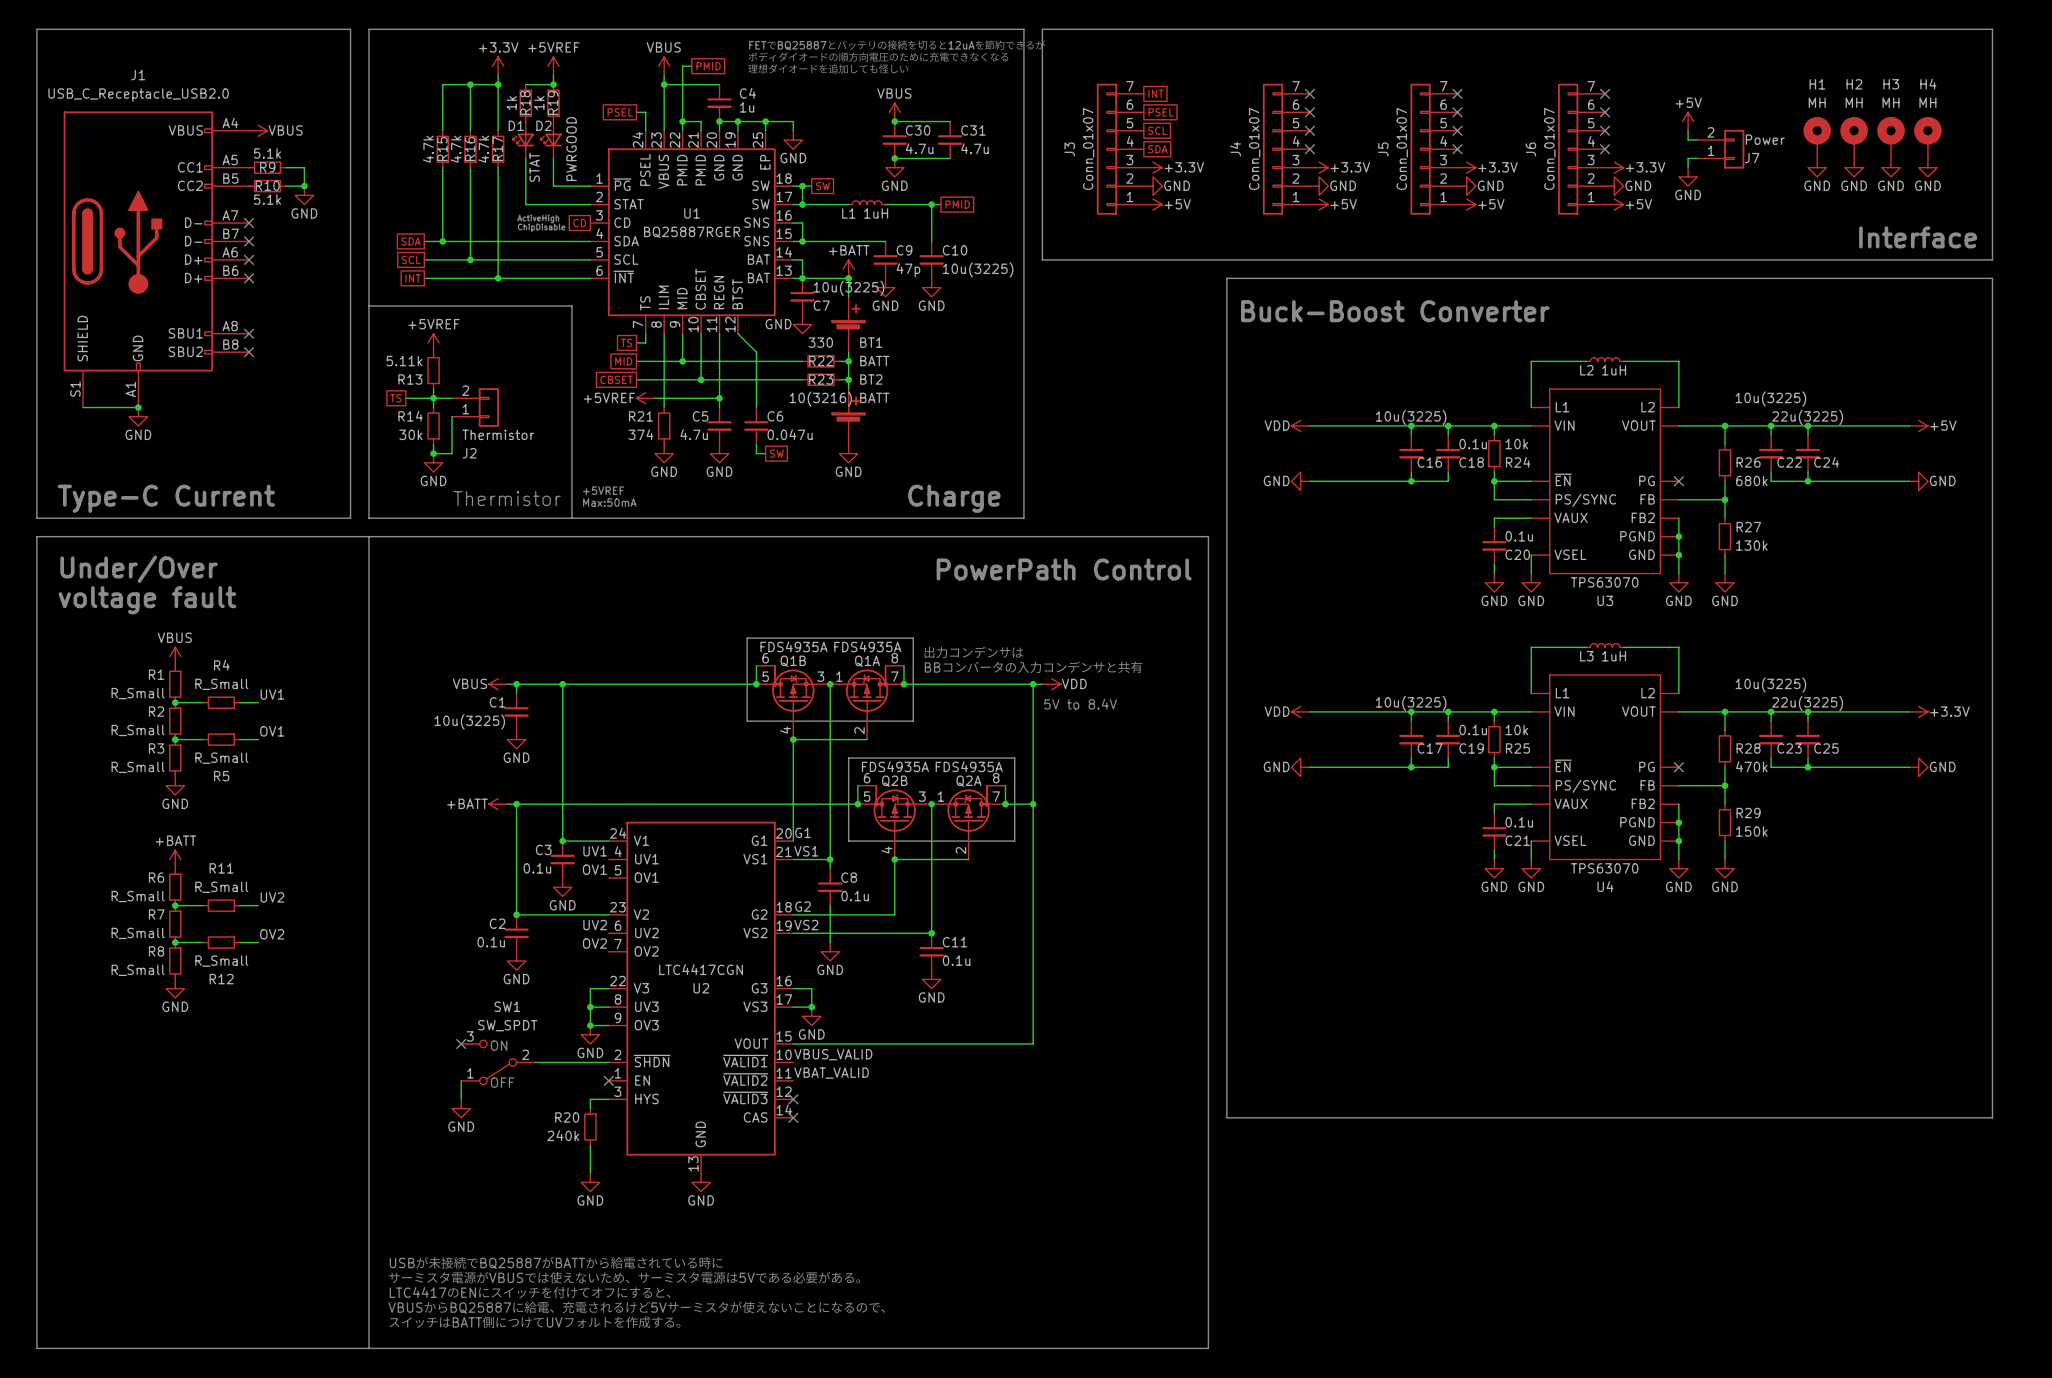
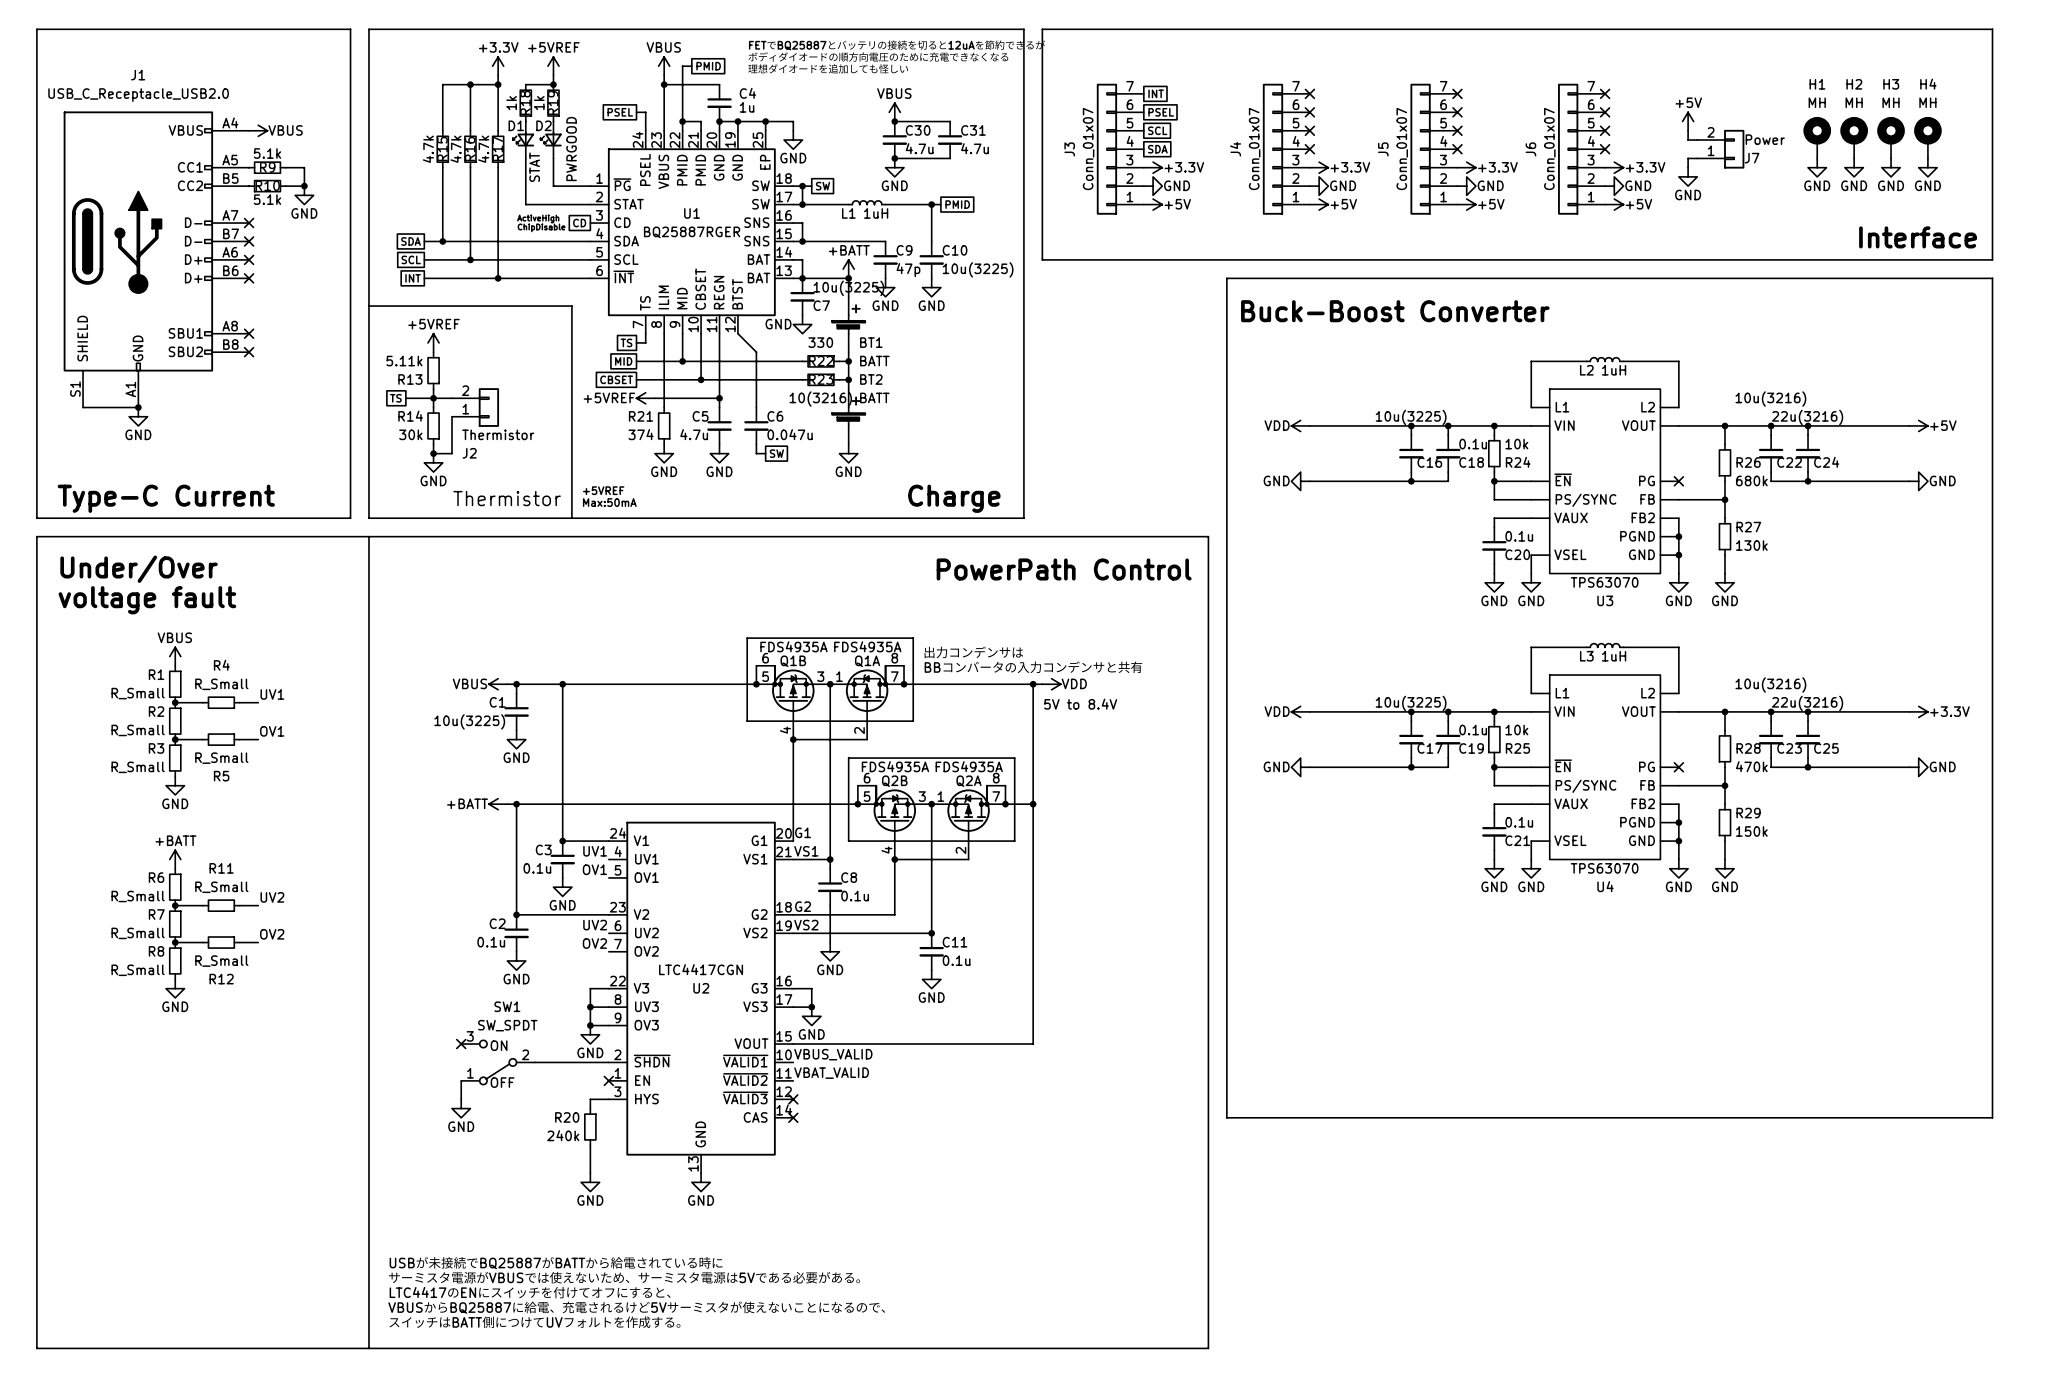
C22 value: 10u(3225) (1770, 399) -> 10u(3216) (1770, 399)
C24 value: 22u(3225) (1807, 417) -> 22u(3216) (1807, 417)
C23 value: 10u(3225) (1770, 685) -> 10u(3216) (1770, 685)
C25 value: 22u(3225) (1807, 703) -> 22u(3216) (1807, 703)

